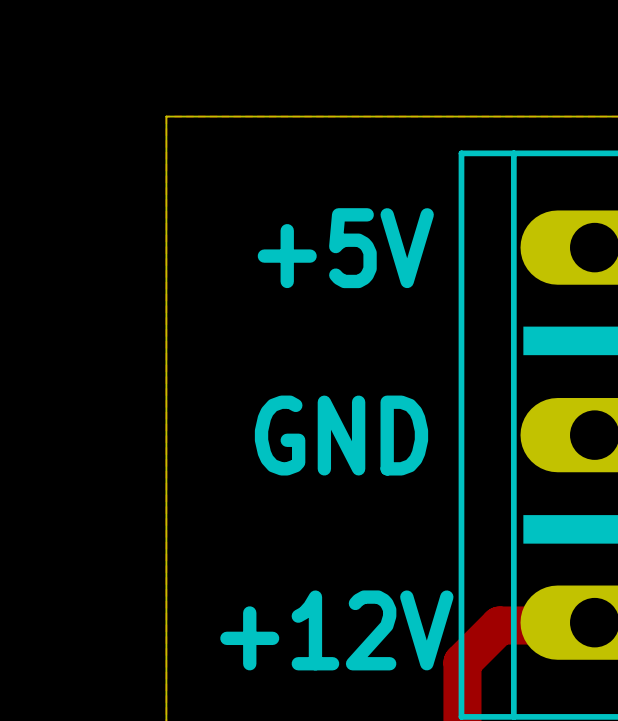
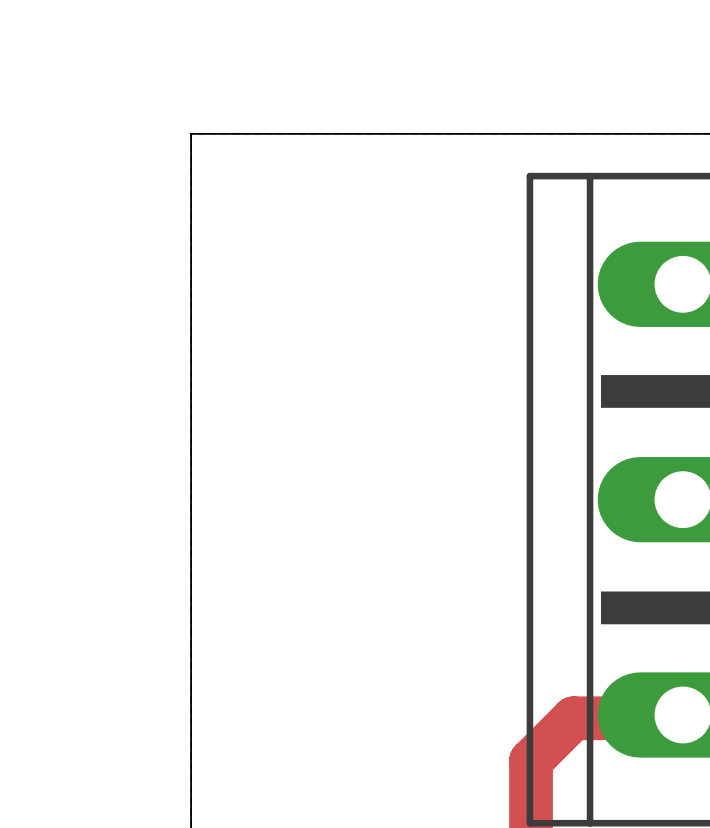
text: +5V (345, 248) -> none
text: GND (341, 435) -> none
text: +12V (336, 630) -> none

